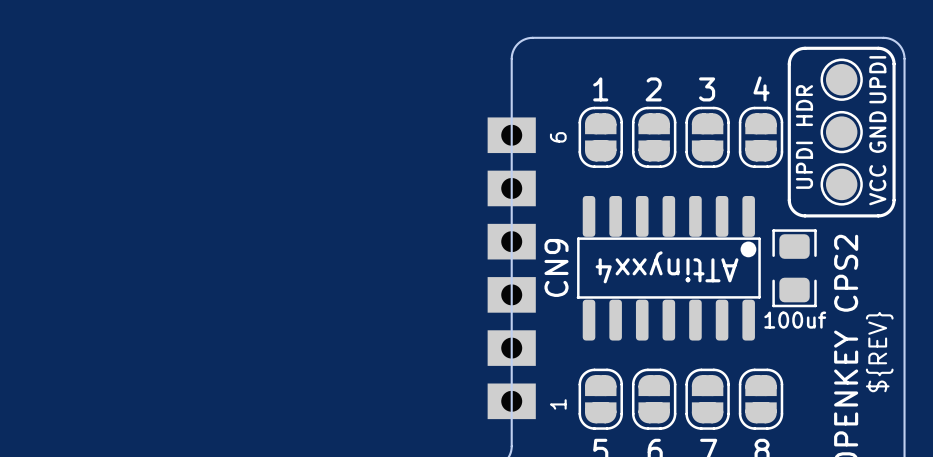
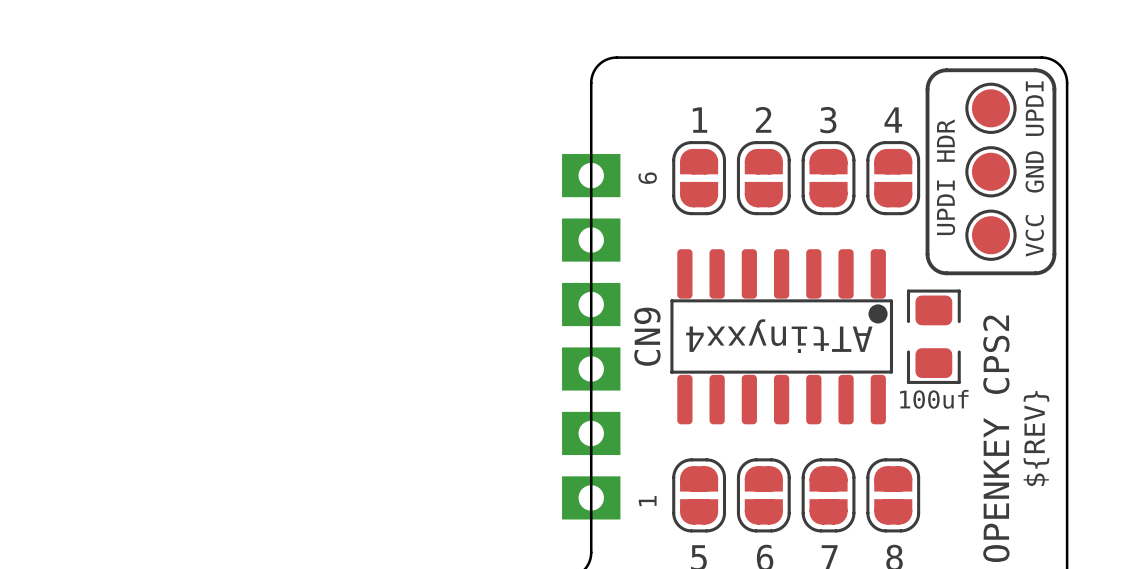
CN9 name: CN9 (556, 267) -> none
text: none -> CN9 (647, 336)

